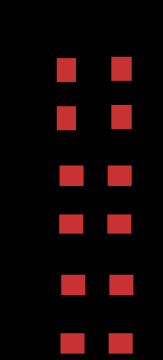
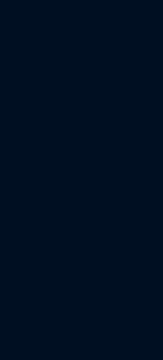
part: (121, 92) -> none
part: (66, 94) -> none
part: (95, 175) -> none
part: (95, 224) -> none
part: (97, 284) -> none
part: (96, 343) -> none

